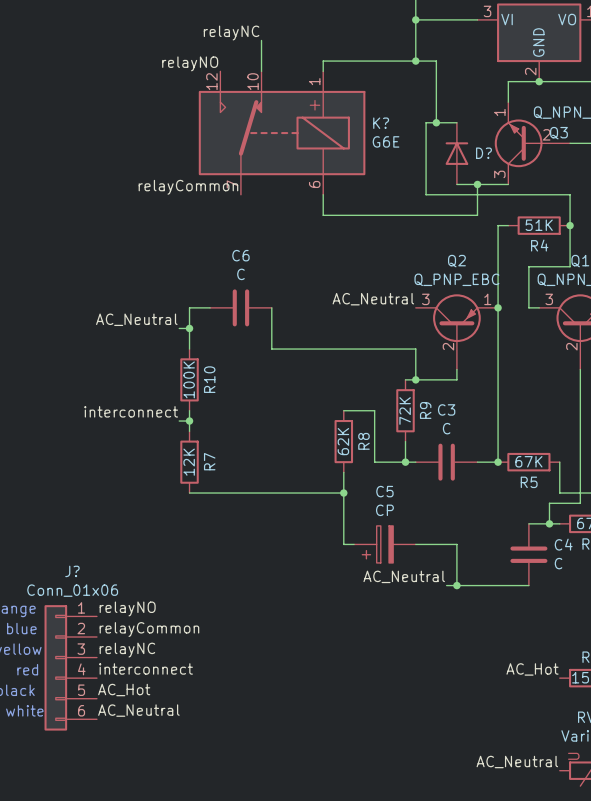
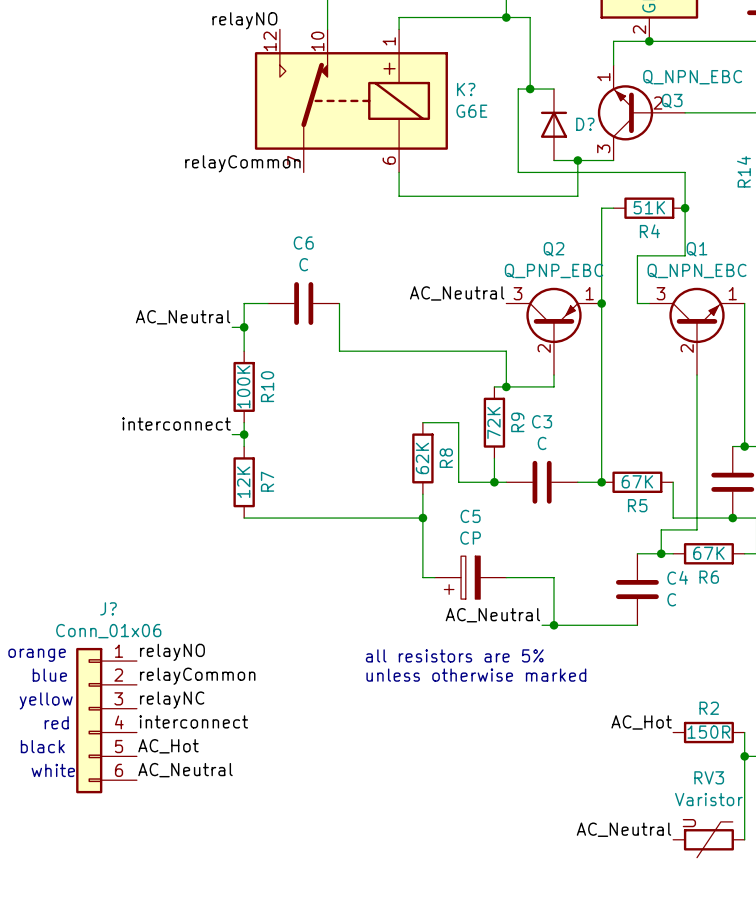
text: none -> all resistors are 5% (454, 655)
text: none -> unless otherwise marked (476, 675)

